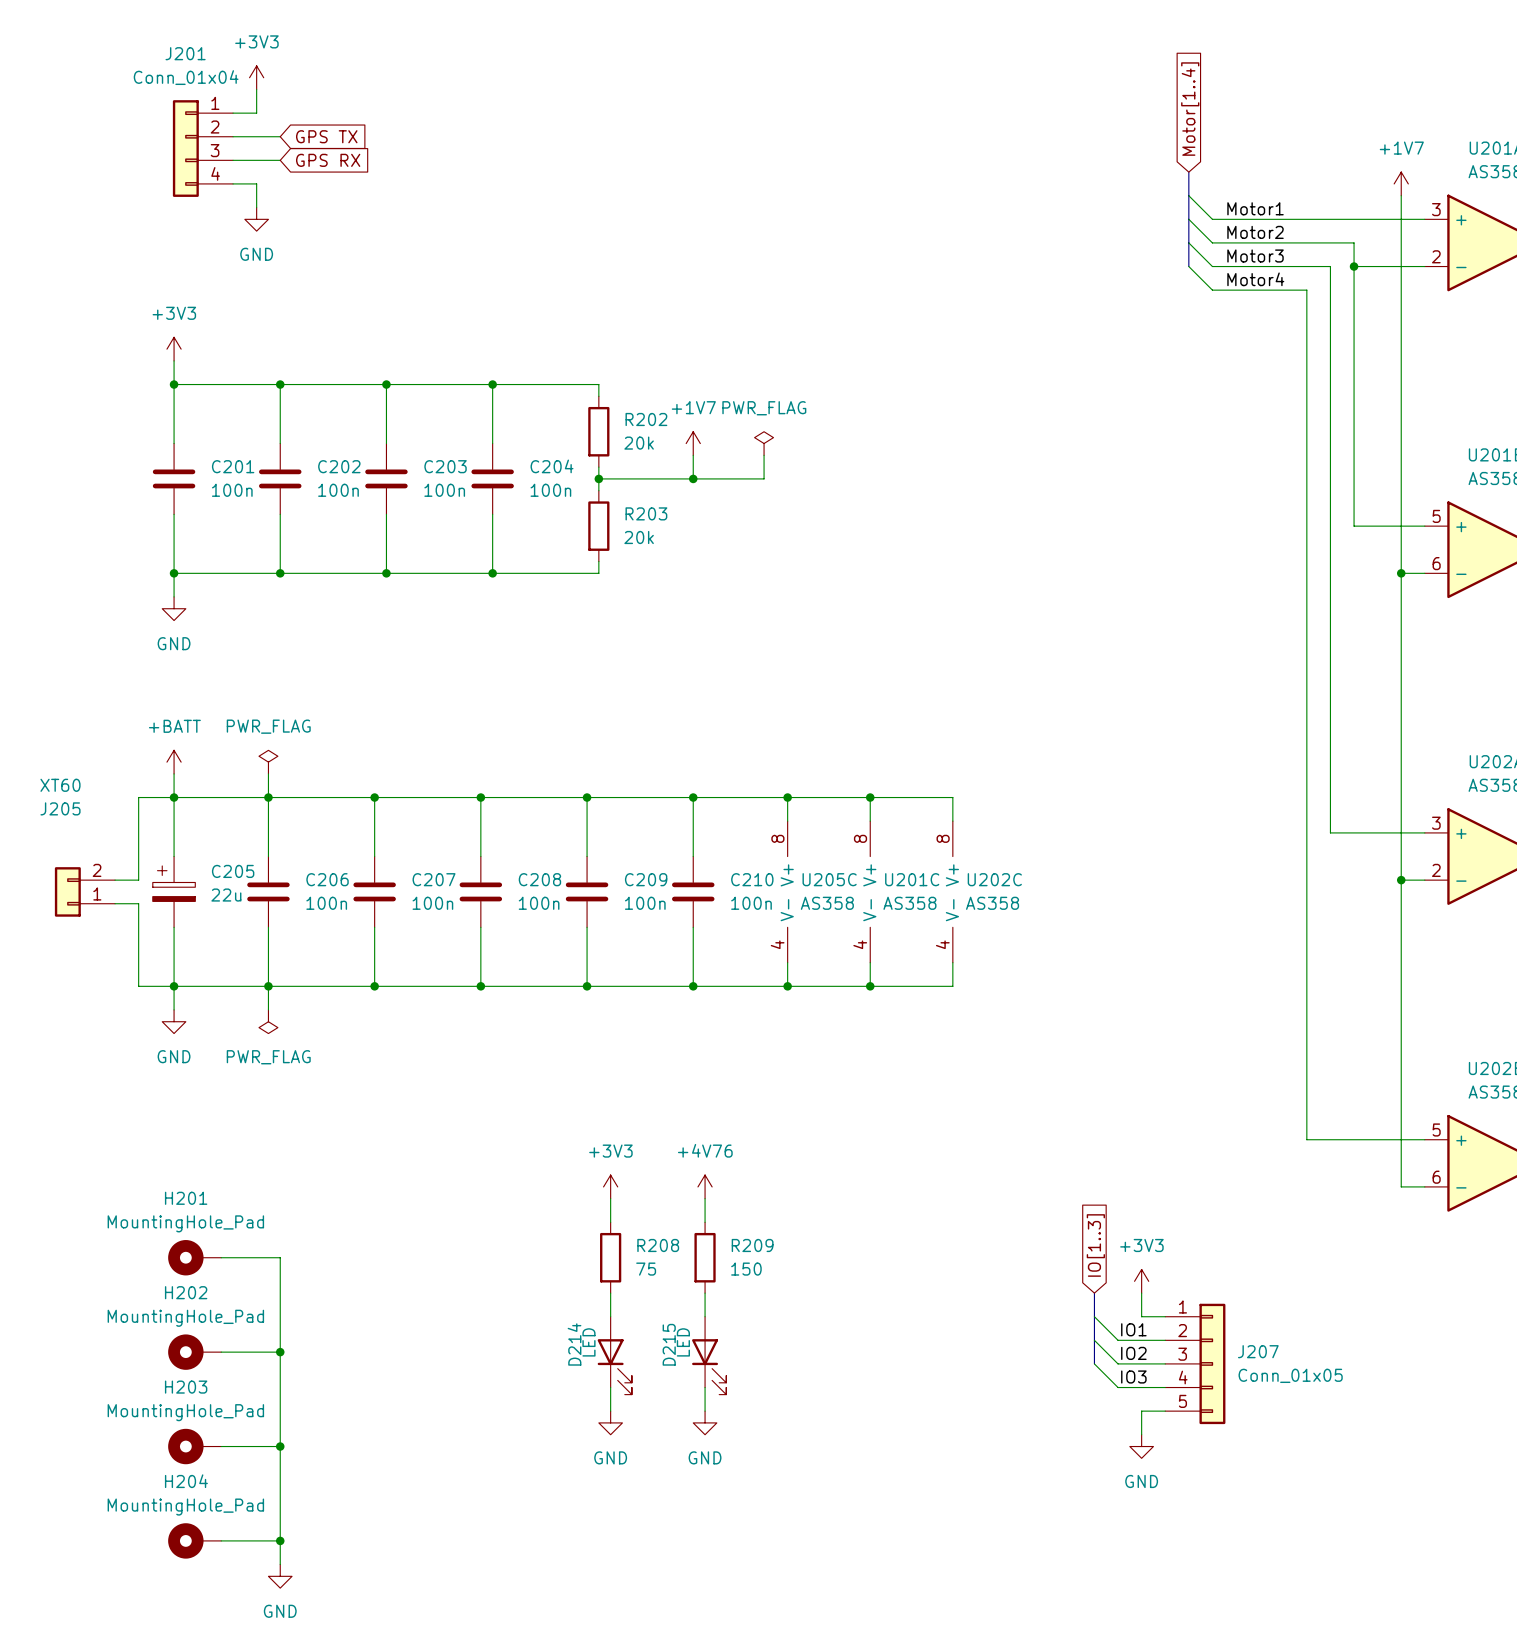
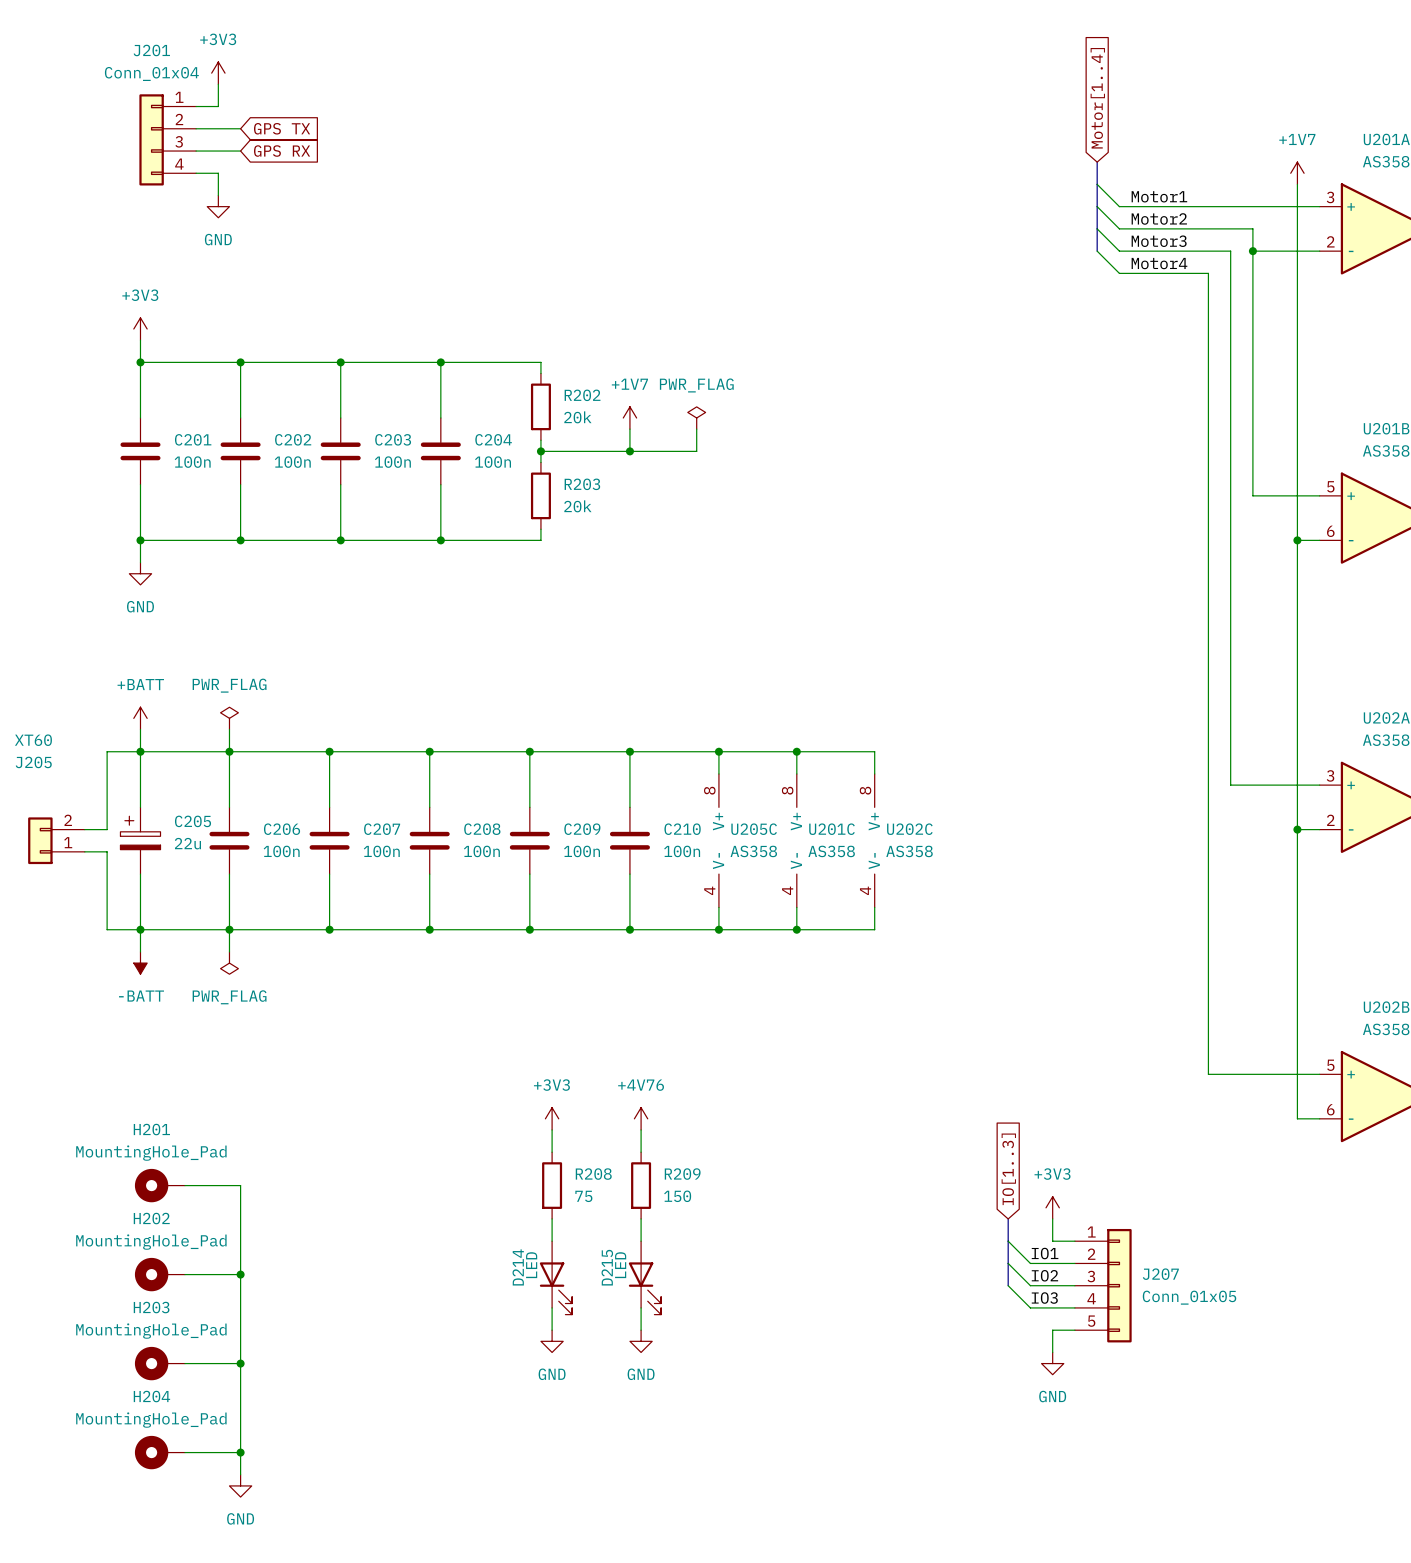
power symbol: GND (174, 1021) -> -BATT (140, 963)

